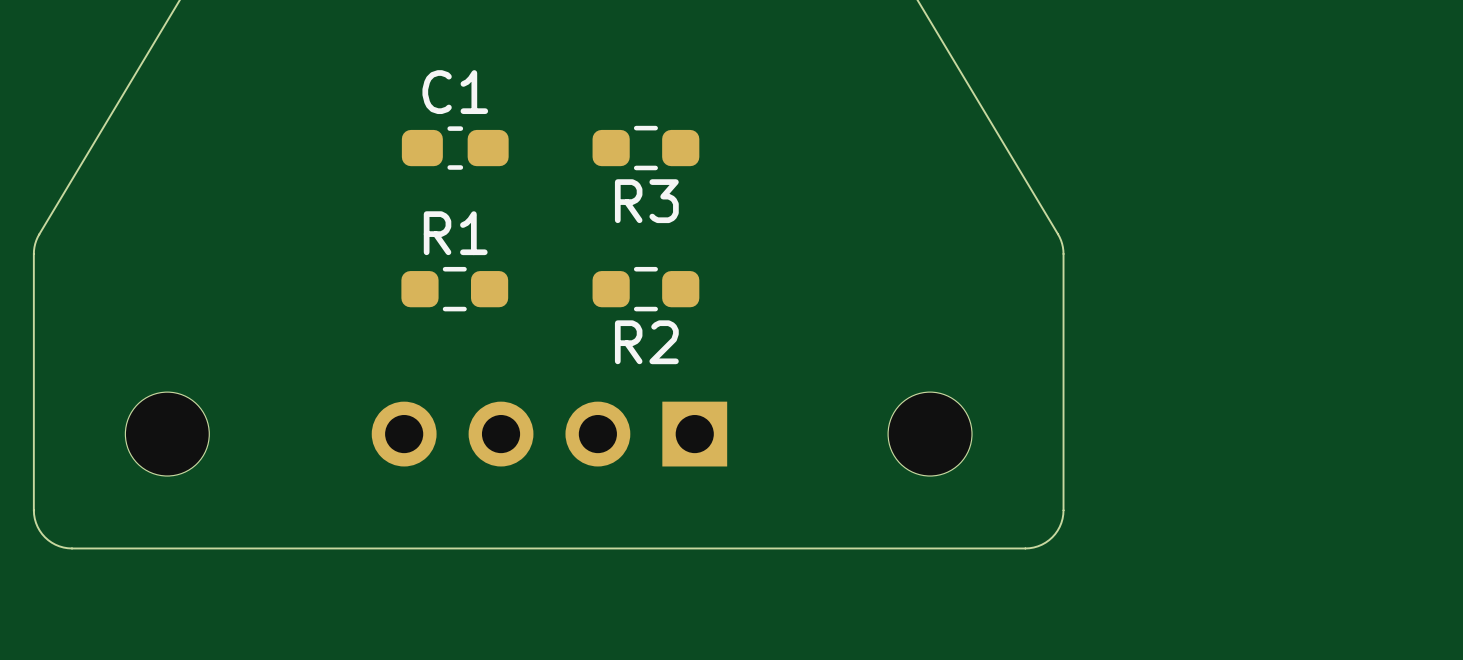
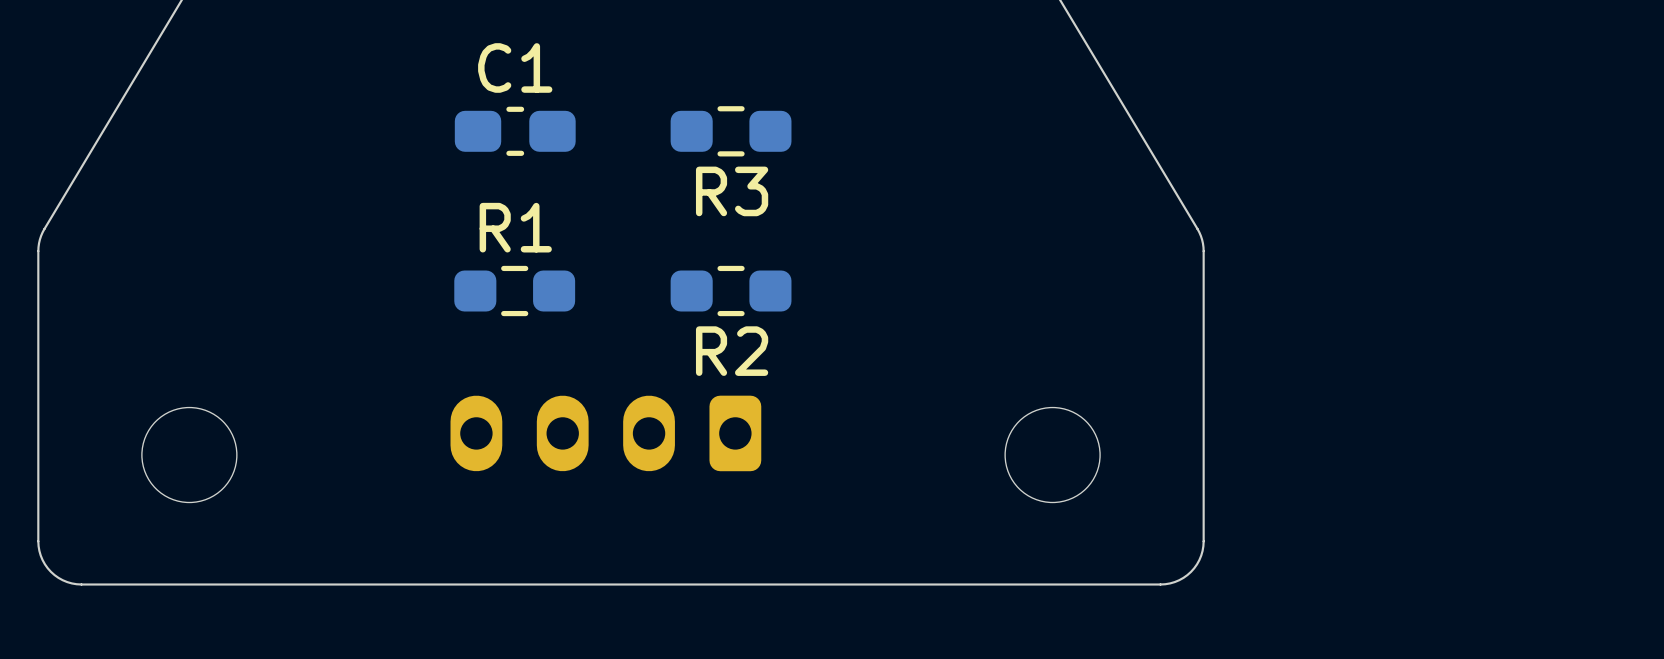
part footprint: [371, 401, 728, 467] -> [450, 395, 762, 472]

